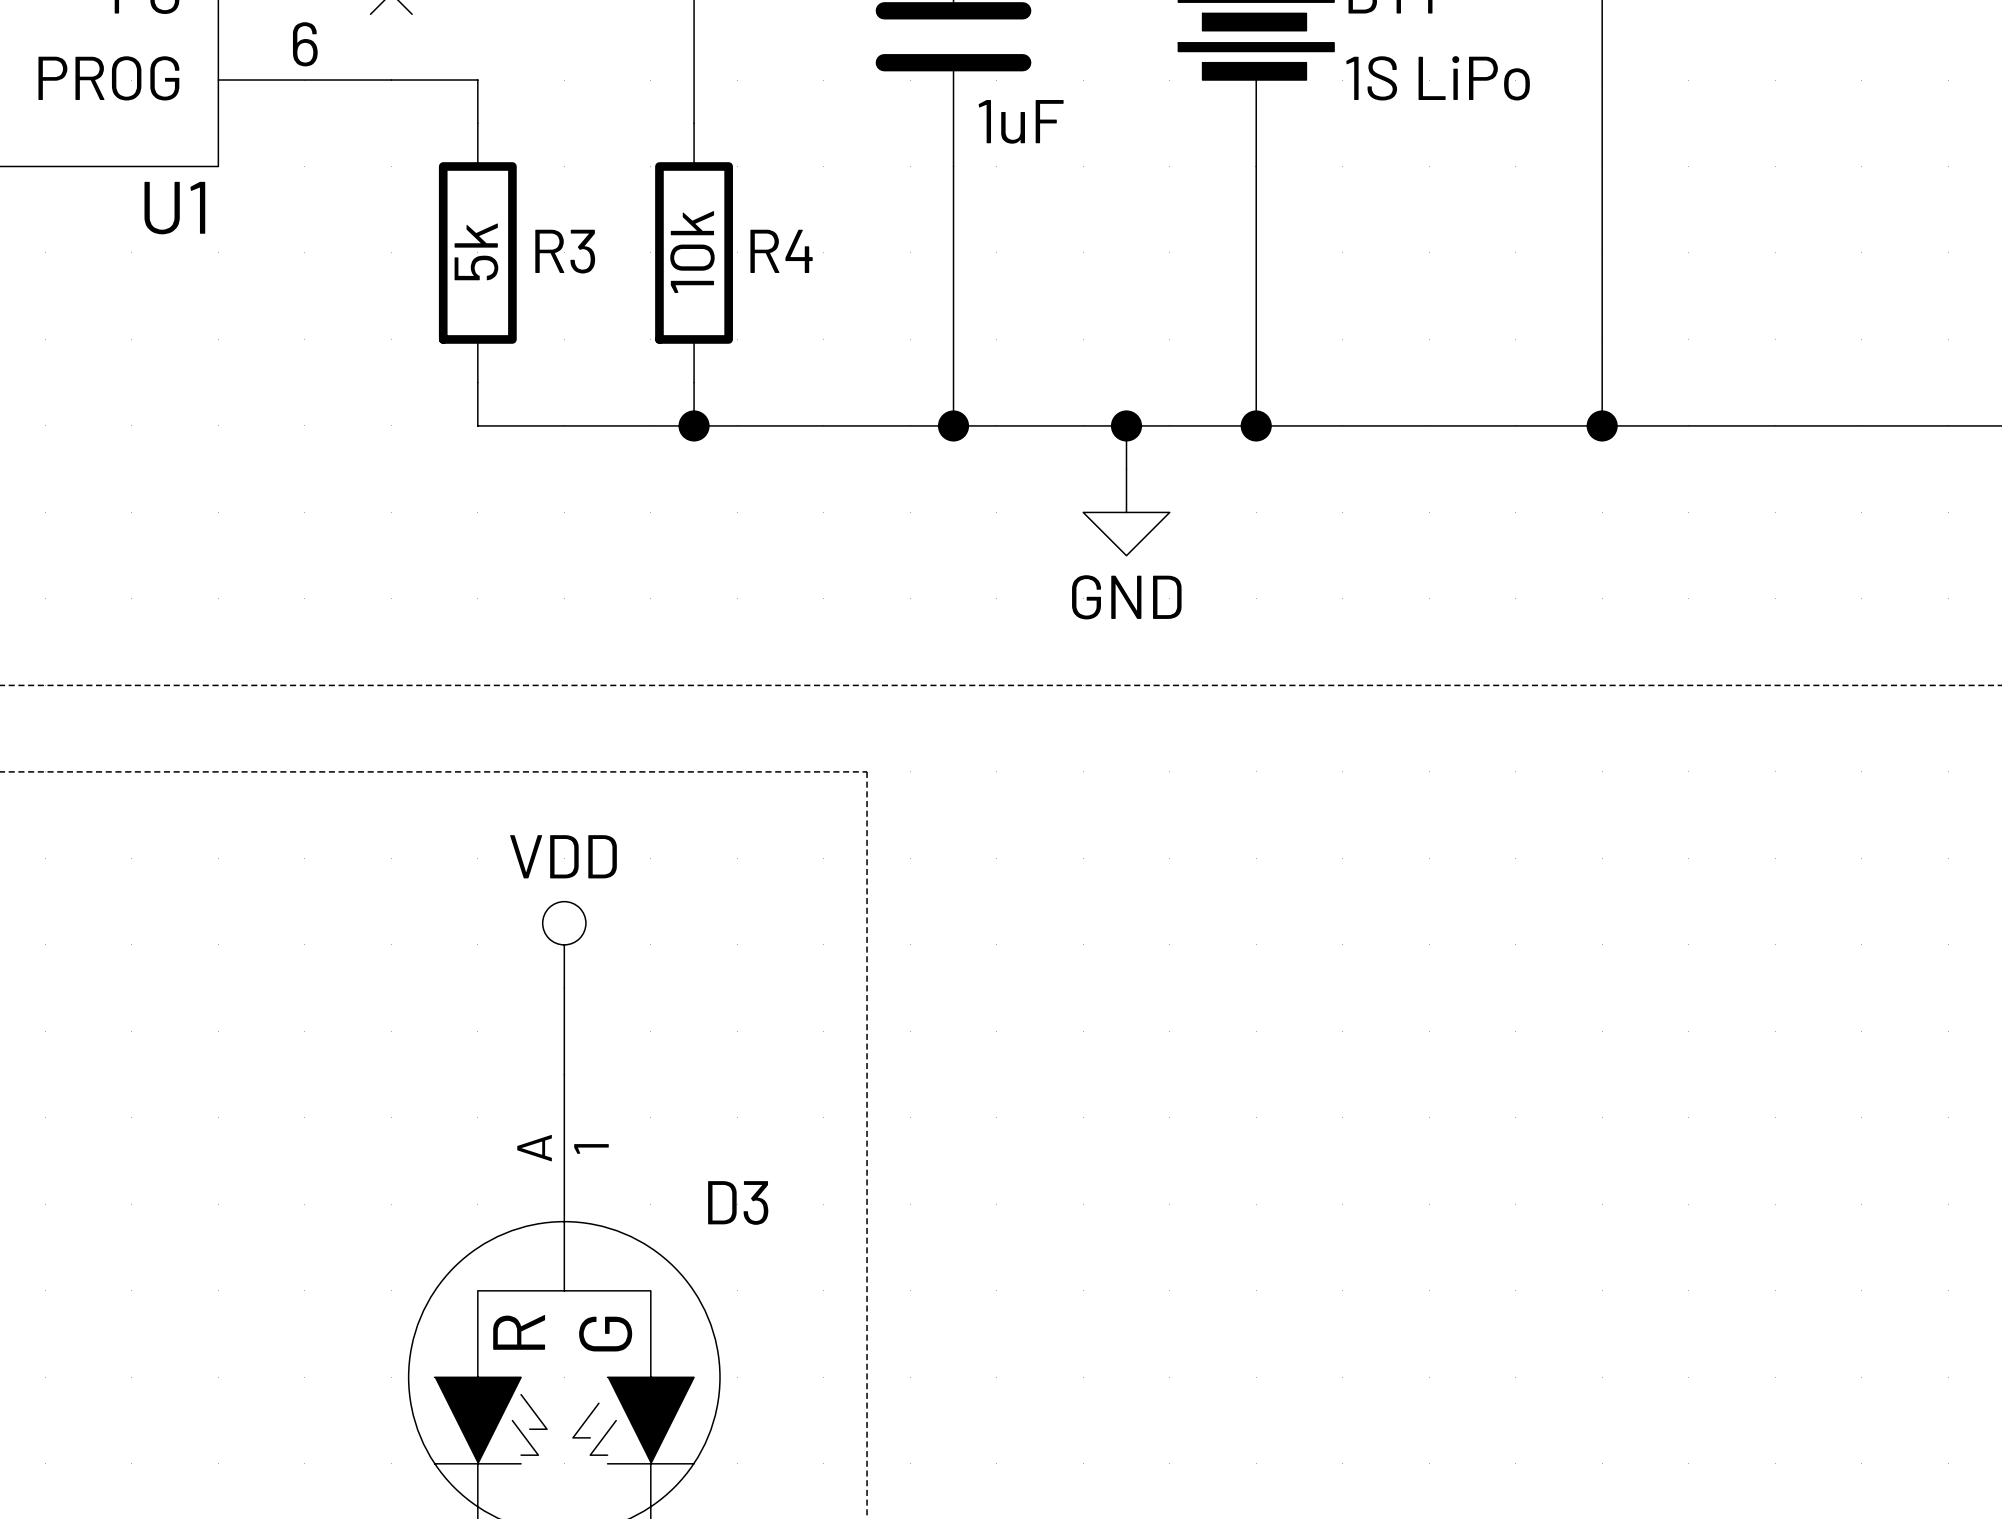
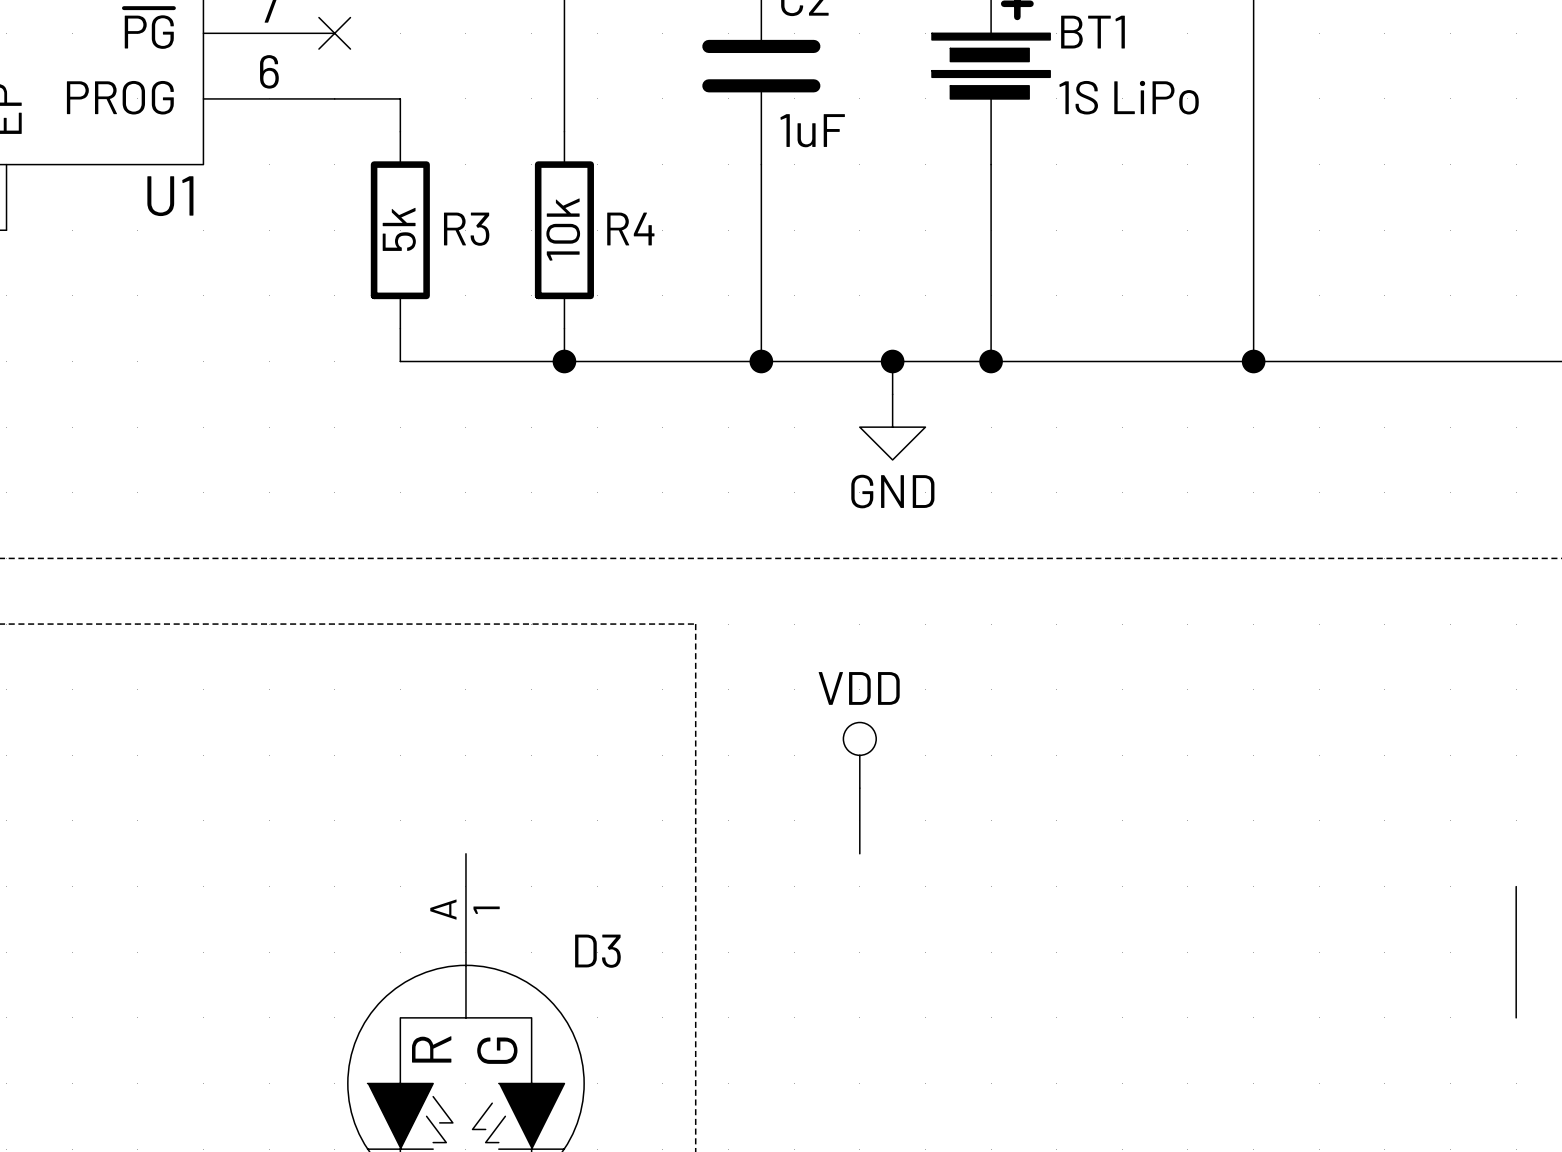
power symbol position: VDD (564, 944) -> VDD (859, 755)
wire: (564, 988) (564, 1074) -> (859, 788) (859, 853)
wire: none -> (1516, 886) (1516, 1017)

